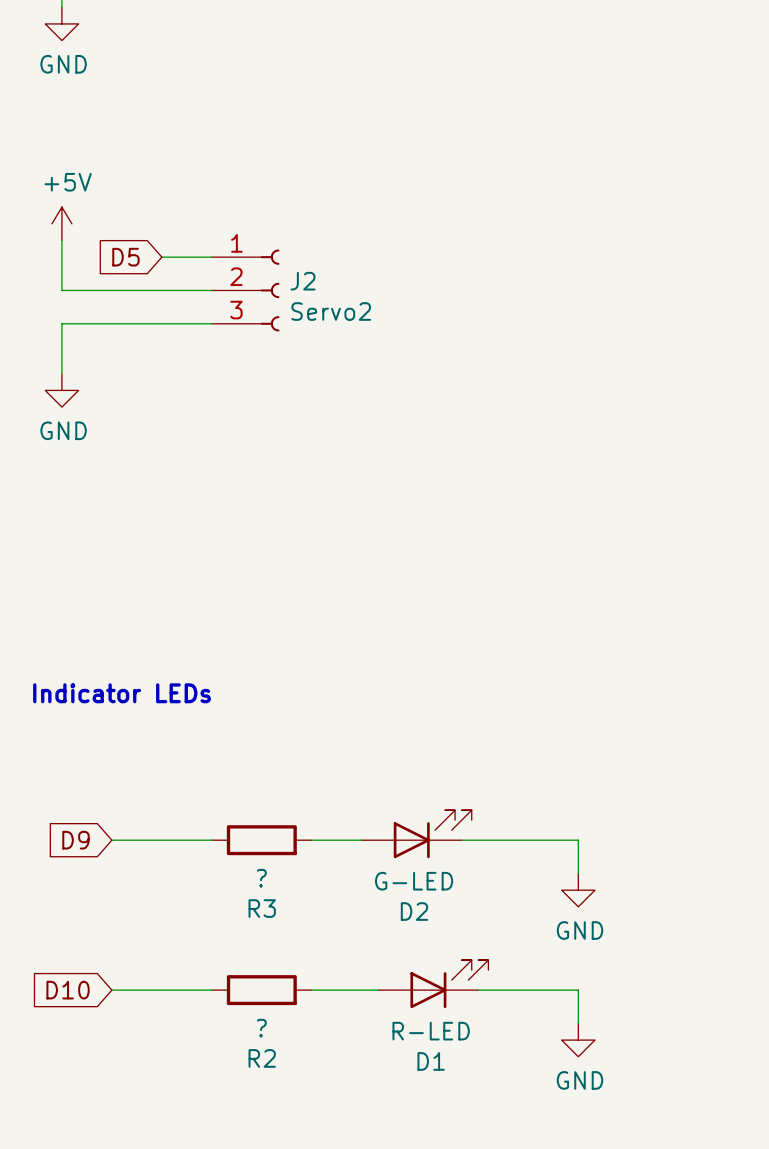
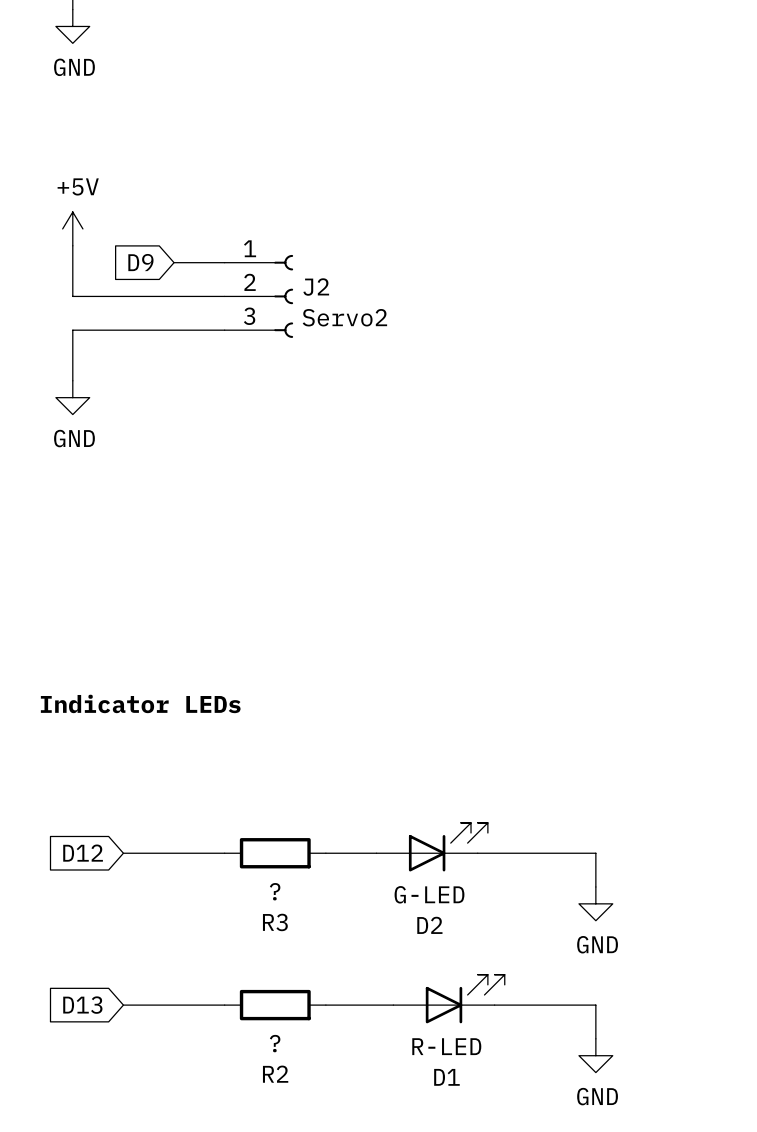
global label: D5 (125, 257) -> D9 (140, 262)
global label: D9 (75, 840) -> D12 (83, 853)
global label: D10 (68, 990) -> D13 (82, 1005)

